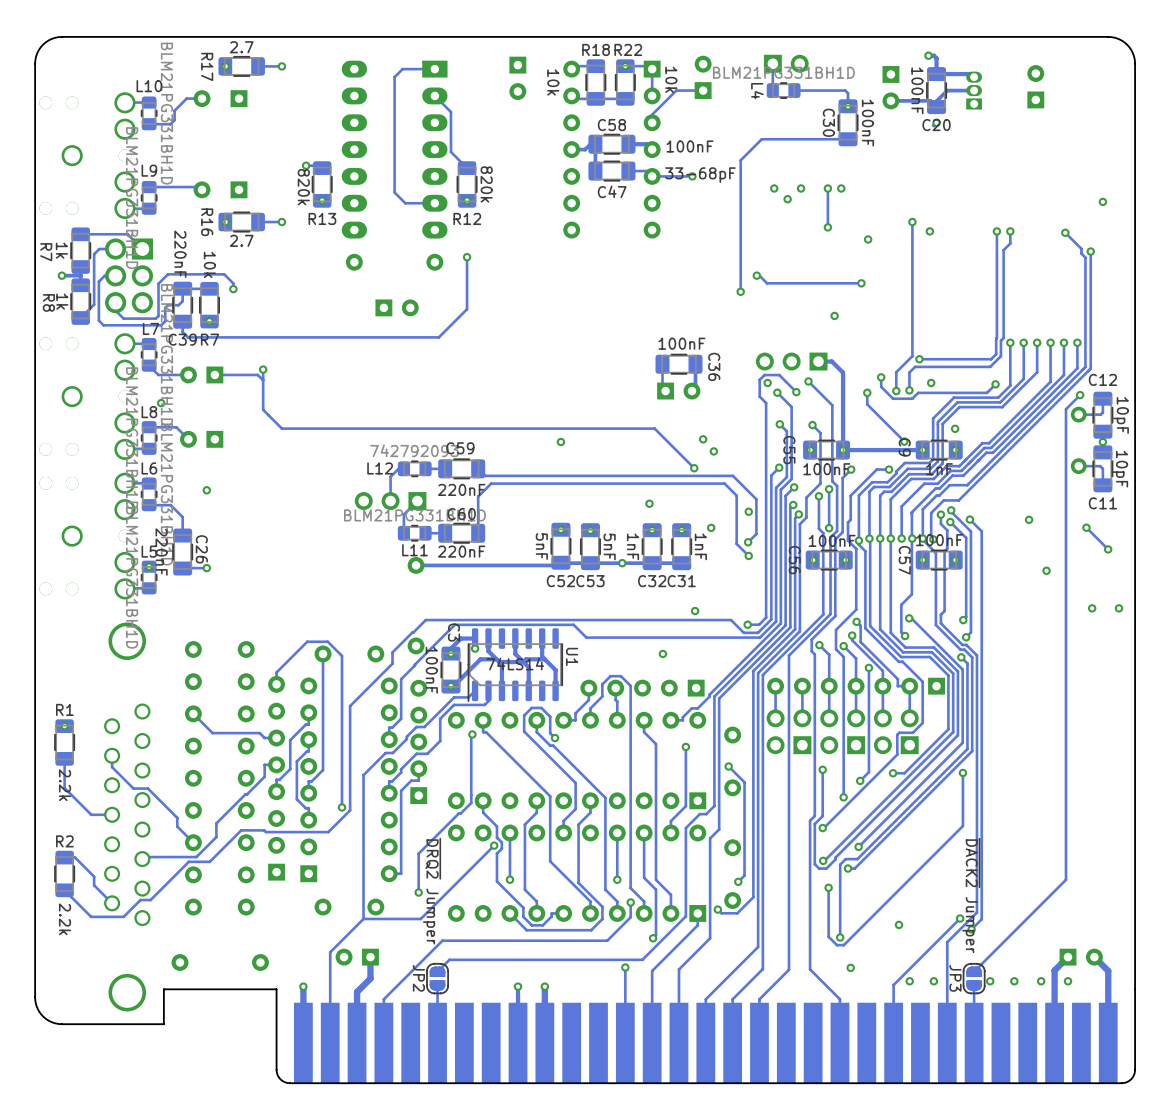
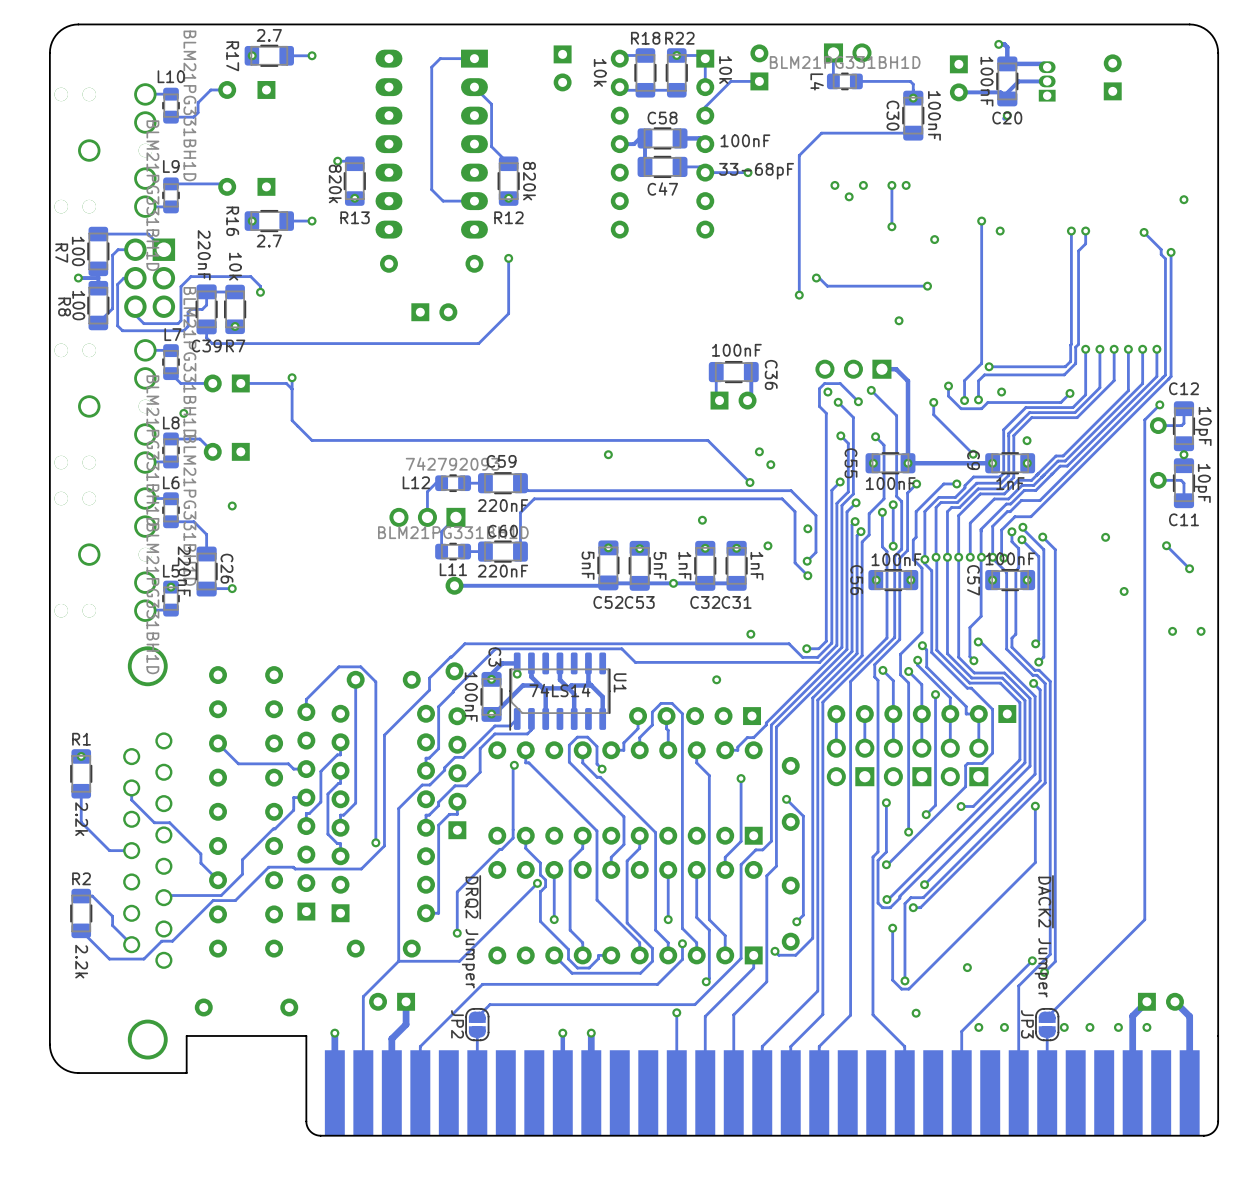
R7 value: 1k (61, 250) -> 100 (78, 251)
R8 value: 1k (62, 301) -> 100 (78, 305)

